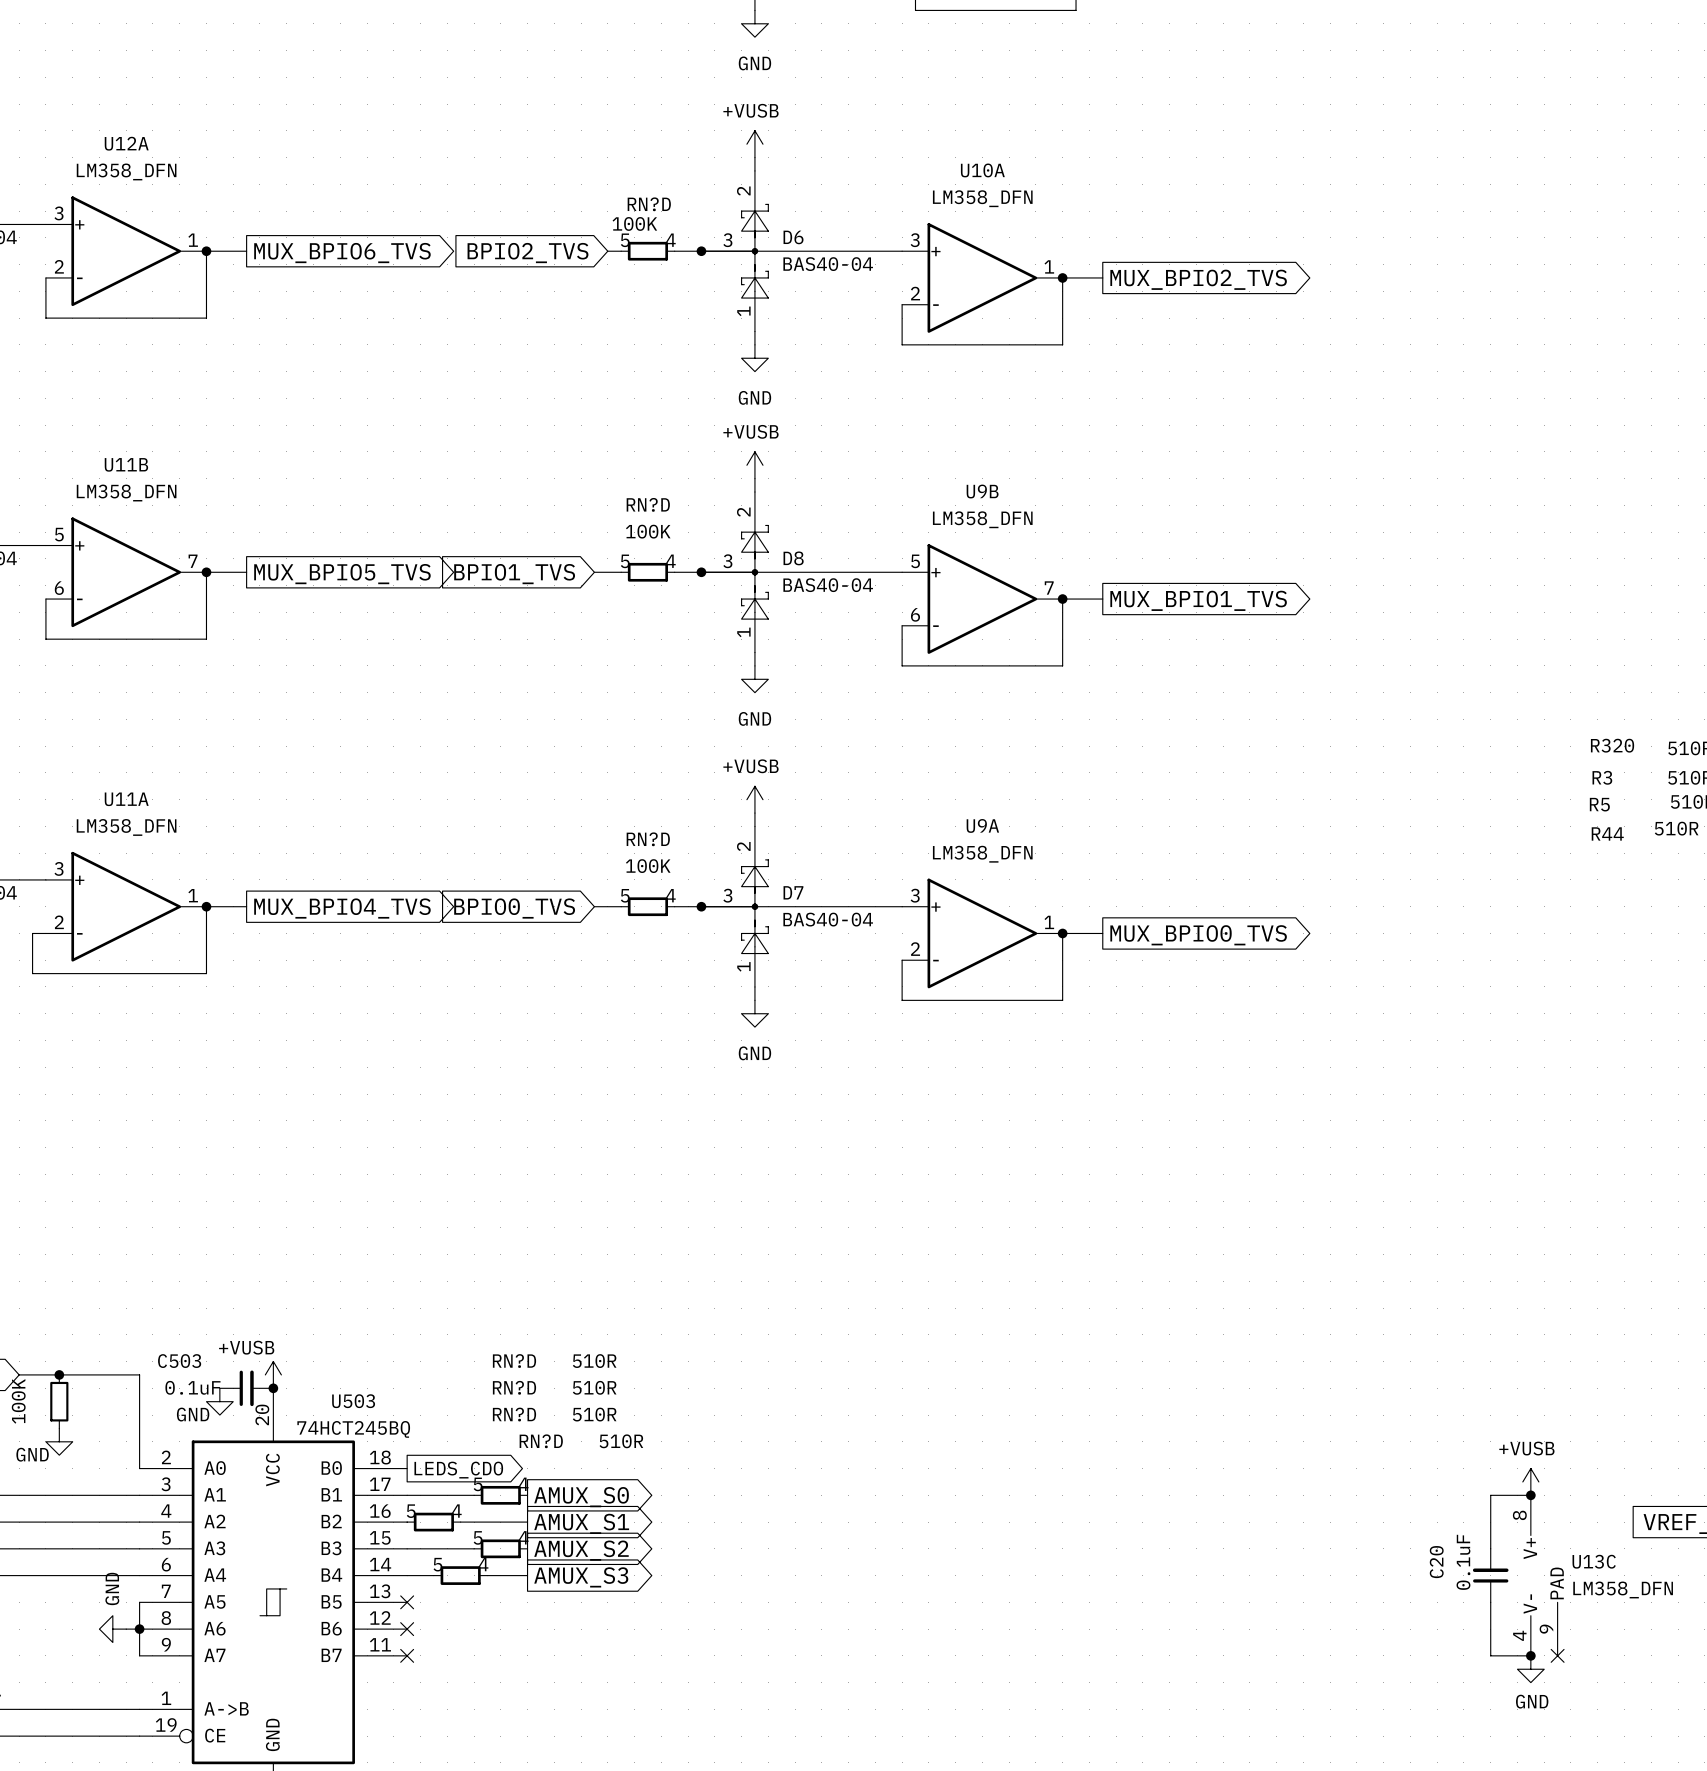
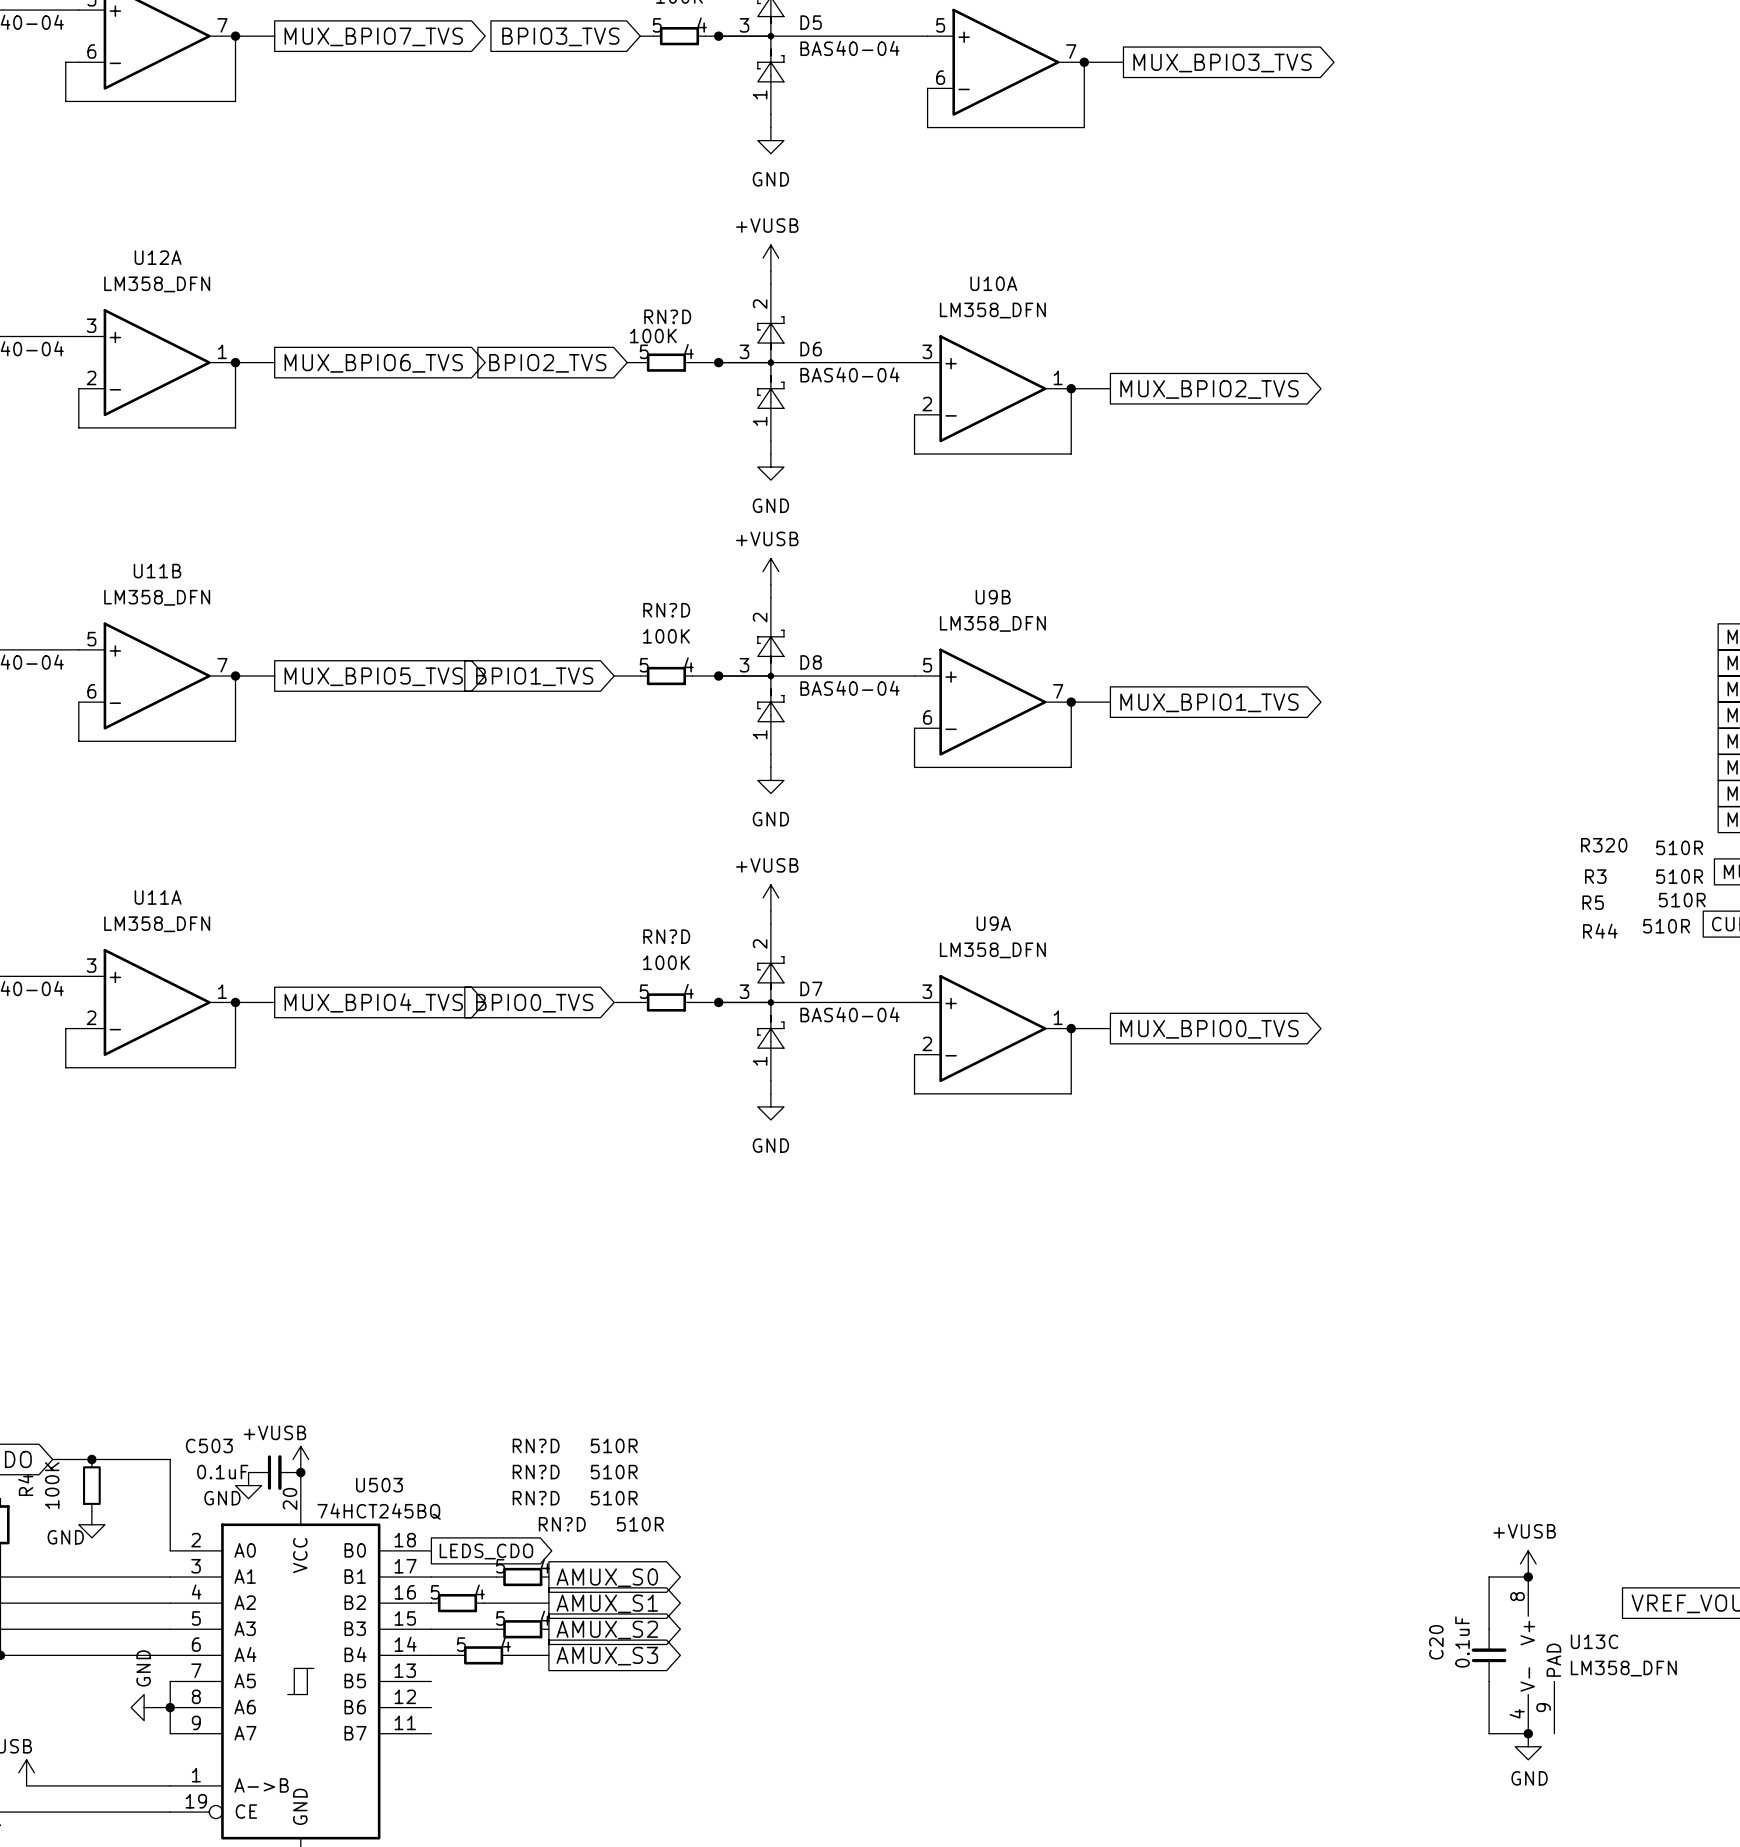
no-connect mark: (407, 1602) -> none
no-connect mark: (407, 1629) -> none
no-connect mark: (407, 1655) -> none
no-connect mark: (1557, 1655) -> none

